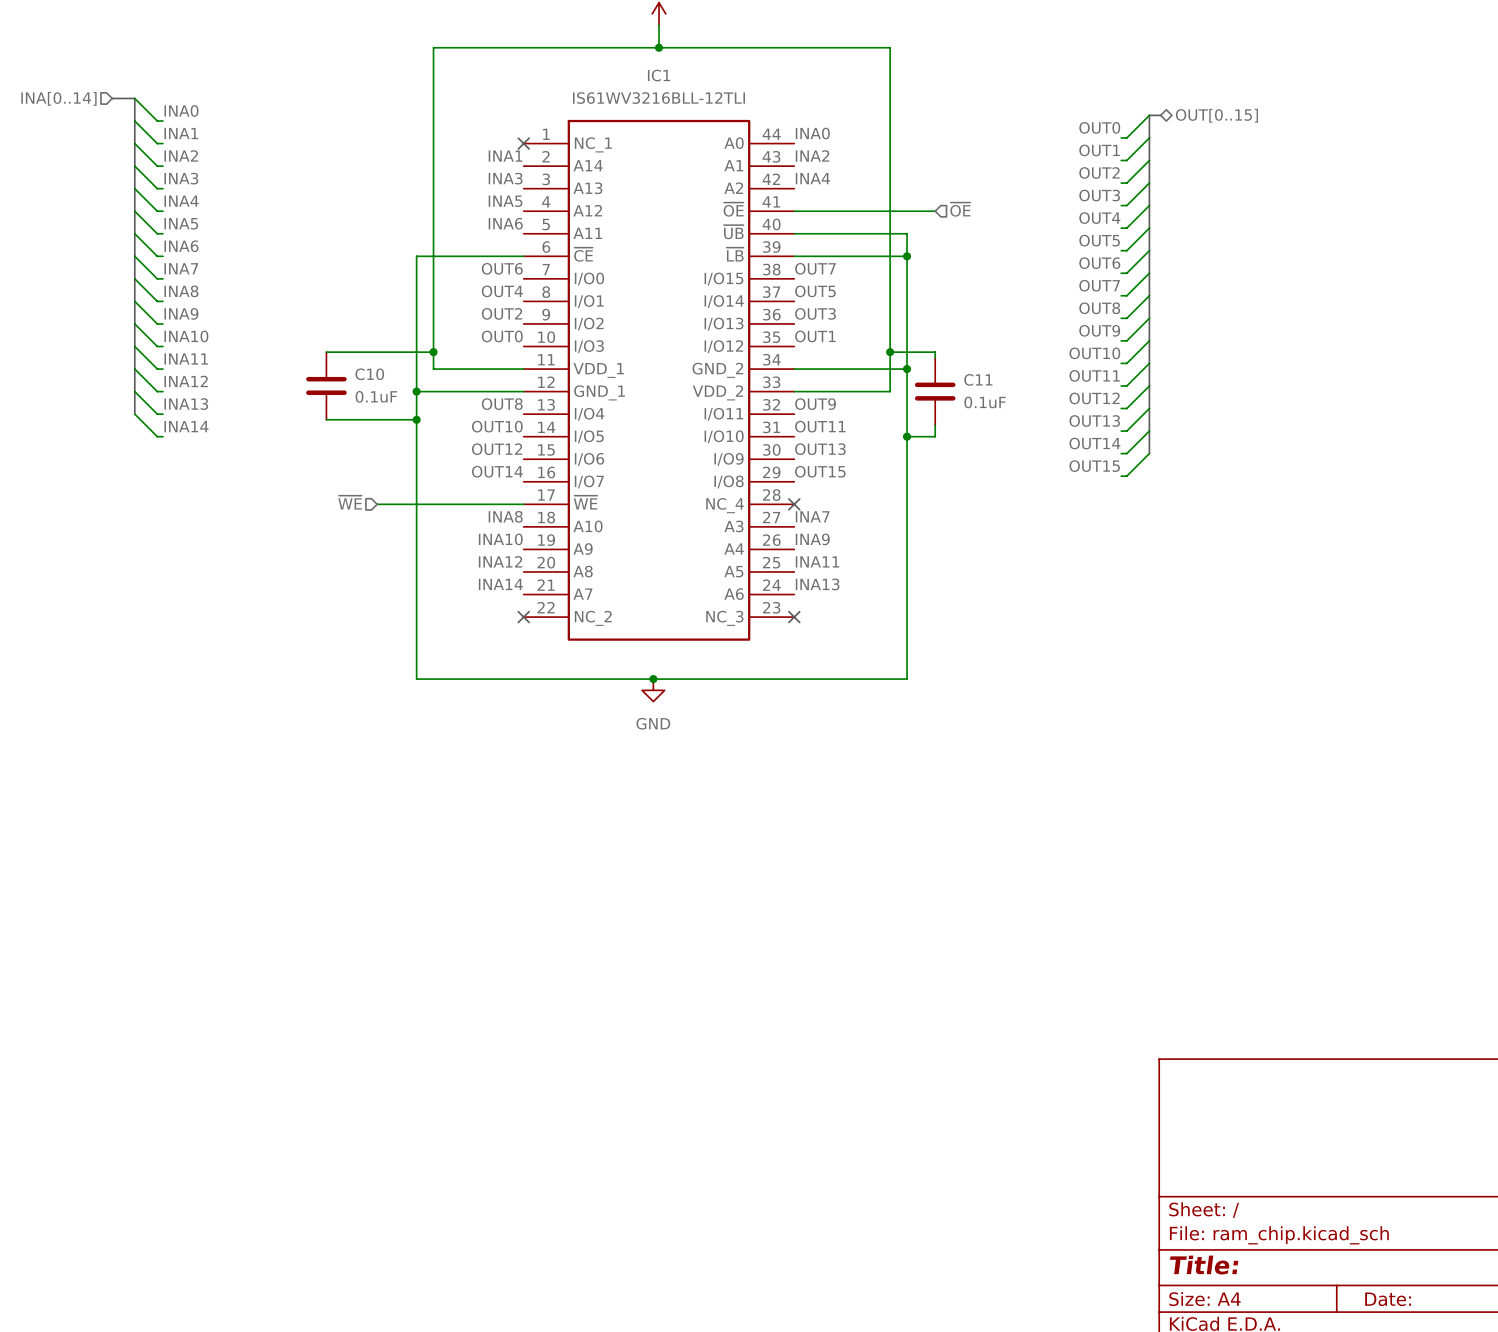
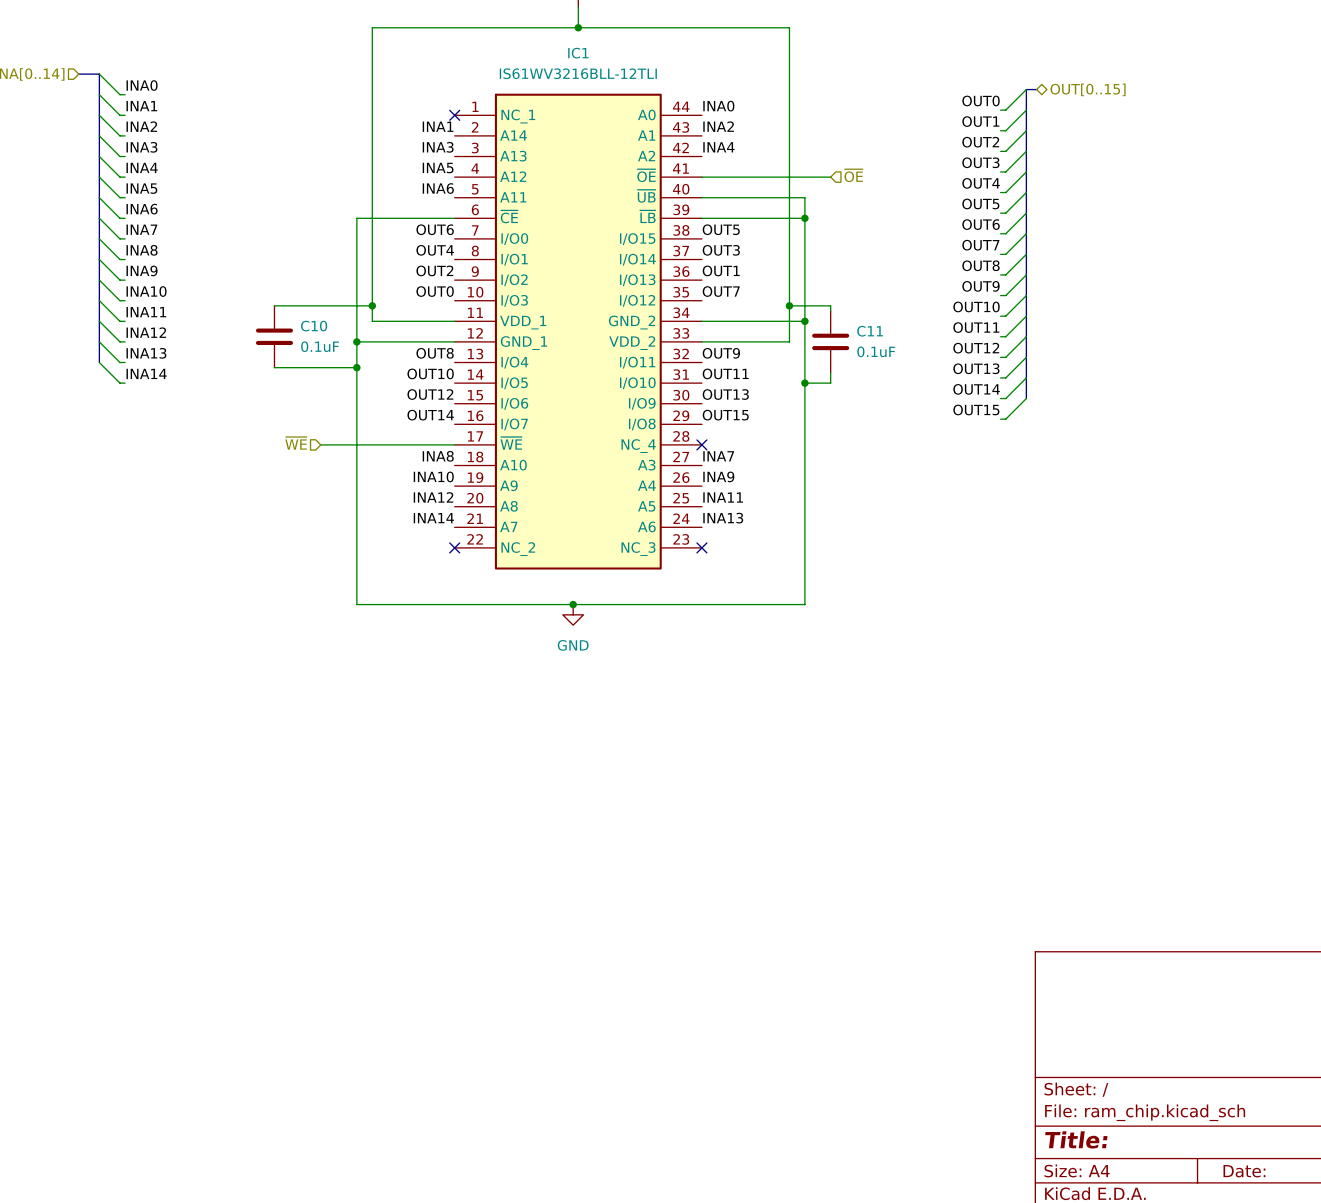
label: OUT7 (815, 268) -> OUT5 (721, 229)
label: OUT5 (815, 291) -> OUT3 (721, 250)
label: OUT3 (815, 313) -> OUT1 (721, 270)
label: OUT1 (815, 336) -> OUT7 (721, 291)

